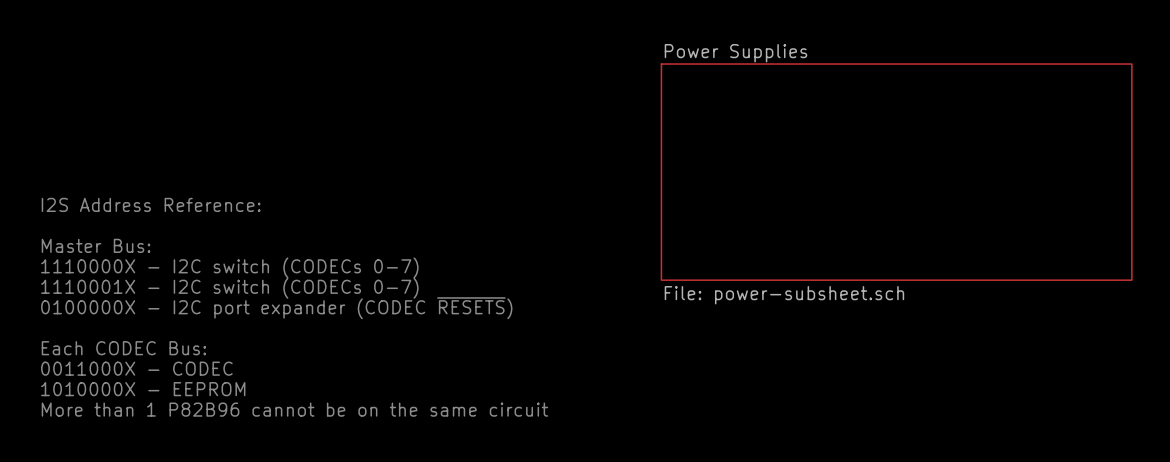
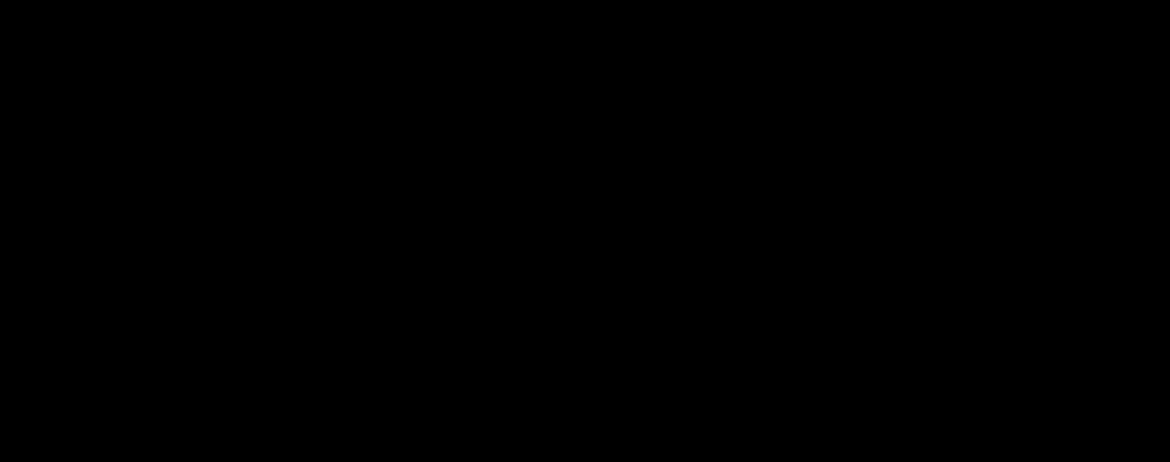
sheet Power Supplies: File: power-subsheet.sch (896, 172) -> none
text: I2S Address Reference: (151, 204) -> none
text: Master Bus: (96, 245) -> none
text: 1110000X - I2C switch (CODECs 0-7) (229, 267) -> none
text: 1110001X - I2C switch (CODECs 0-7) (229, 288) -> none
text: 0100000X - I2C port expander (CODEC ~{RESETS}) (276, 308) -> none
text: Each CODEC Bus: (123, 348) -> none
text: 0011000X - CODEC (136, 368) -> none
text: 1010000X - EEPROM (143, 389) -> none
text: More than 1 P82B96 cannot be on the same circuit (294, 409) -> none

